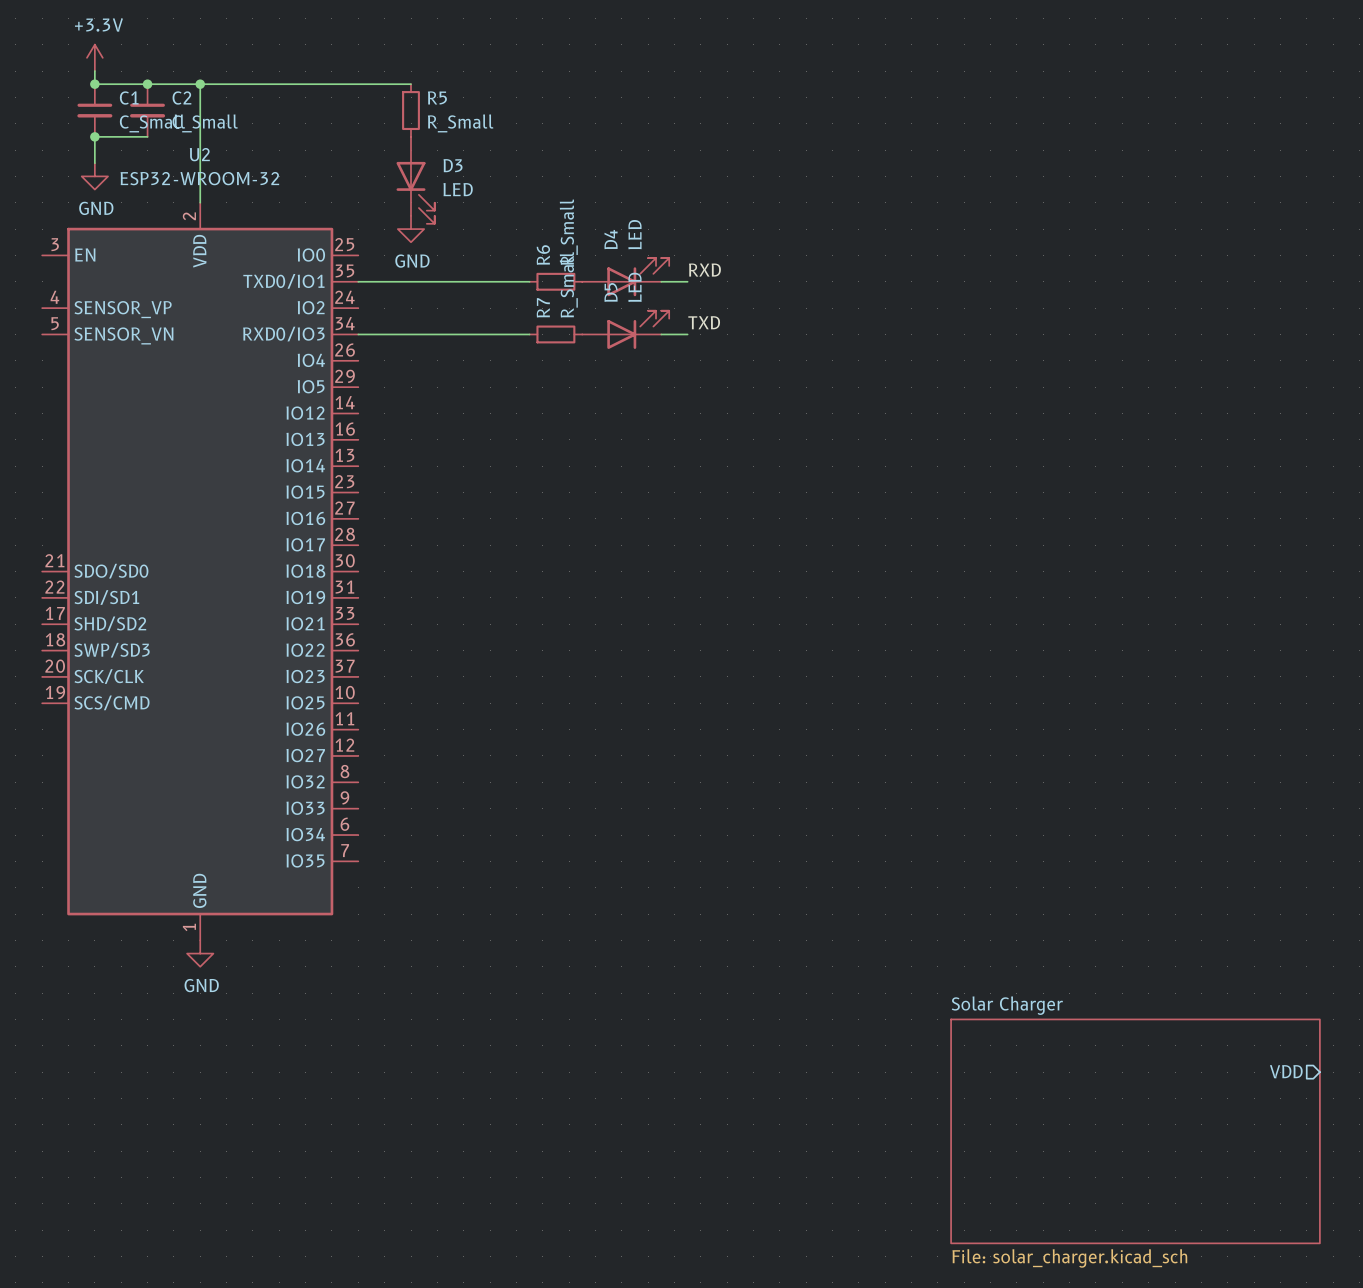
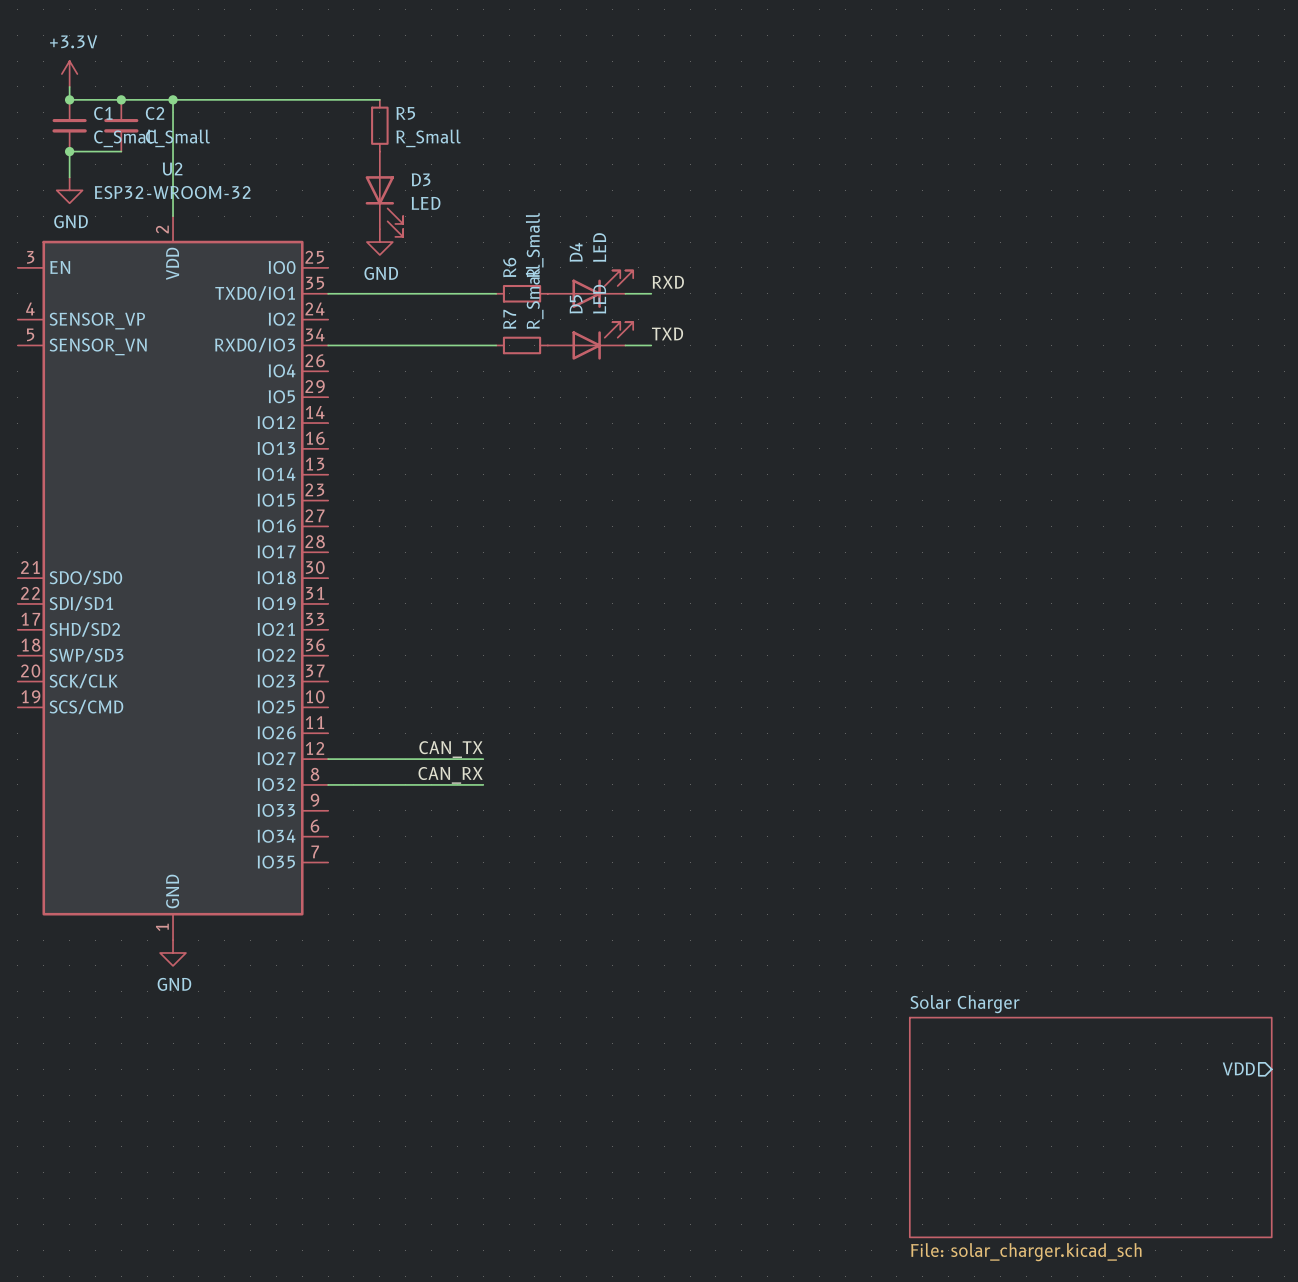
label: none -> CAN_TX (451, 749)
wire: none -> (328, 759) (483, 759)
label: none -> CAN_RX (450, 775)
wire: none -> (328, 784) (483, 784)

